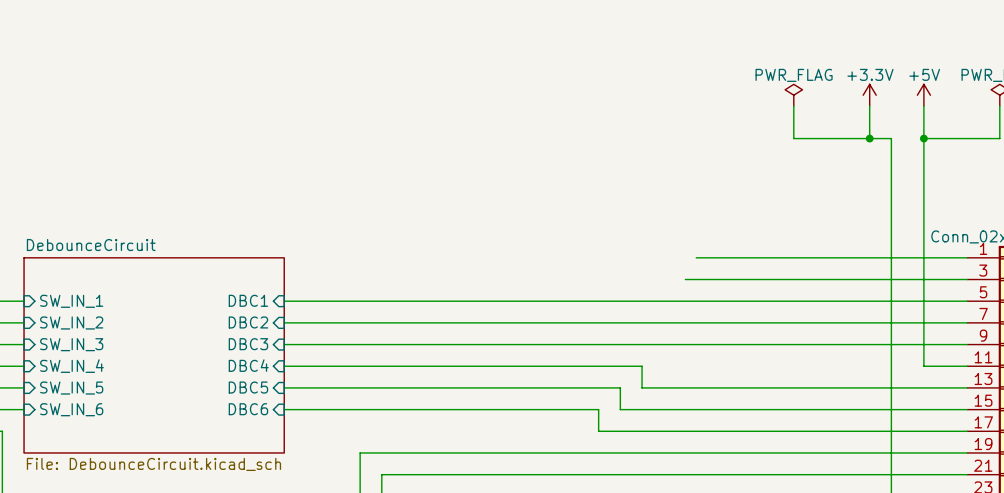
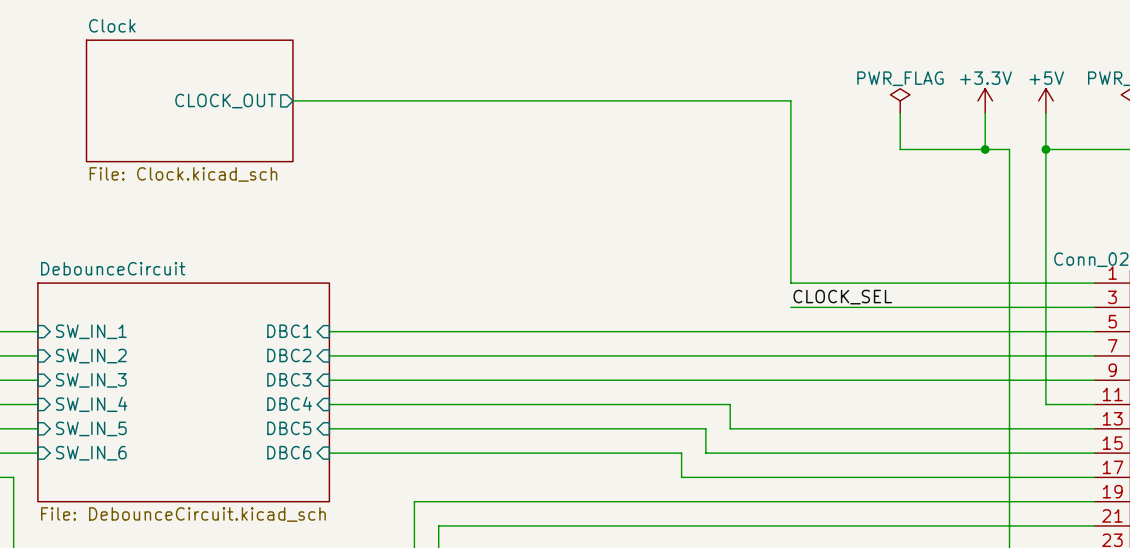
sheet Clock: none -> File: Clock.kicad_sch (189, 100)
sheet pin: none -> CLOCK_OUT (225, 101)
wire: none -> (292, 100) (790, 100) (790, 283)
label: none -> CLOCK_SEL (842, 297)
wire: (685, 279) (696, 279) -> none

